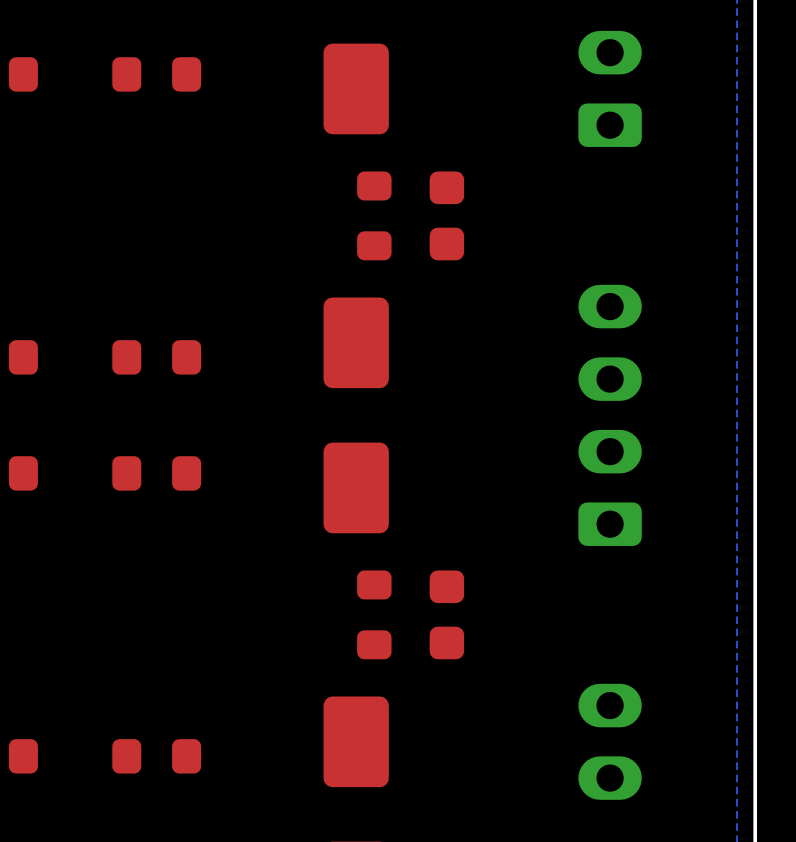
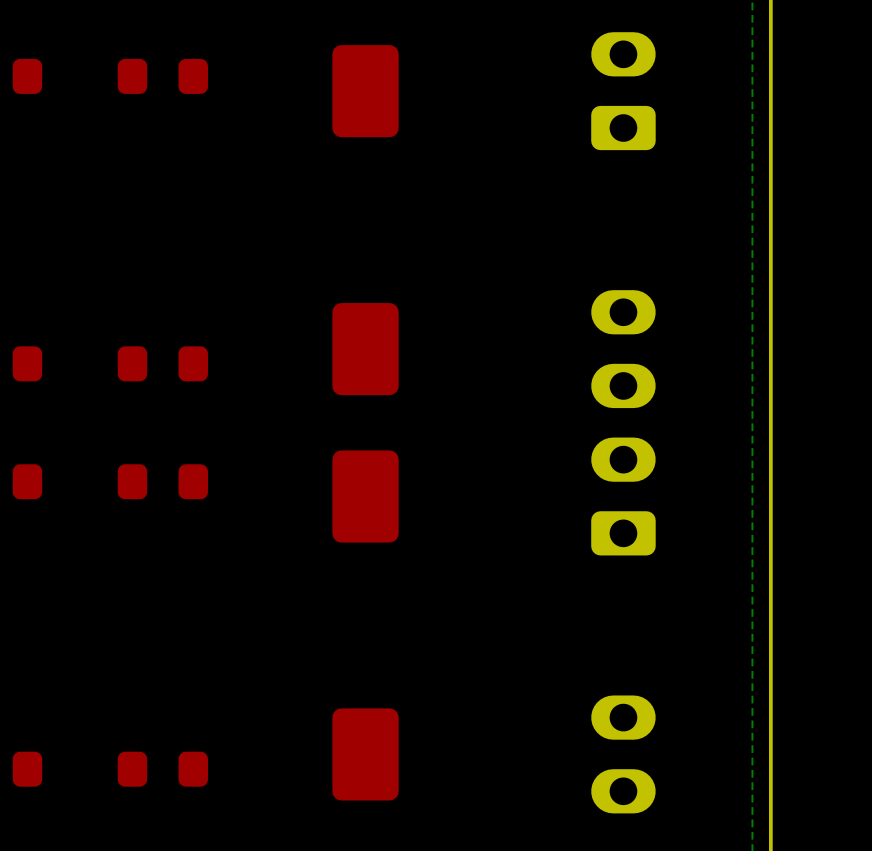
part: (374, 215) -> none
part: (446, 215) -> none
part: (374, 614) -> none
part: (446, 614) -> none

